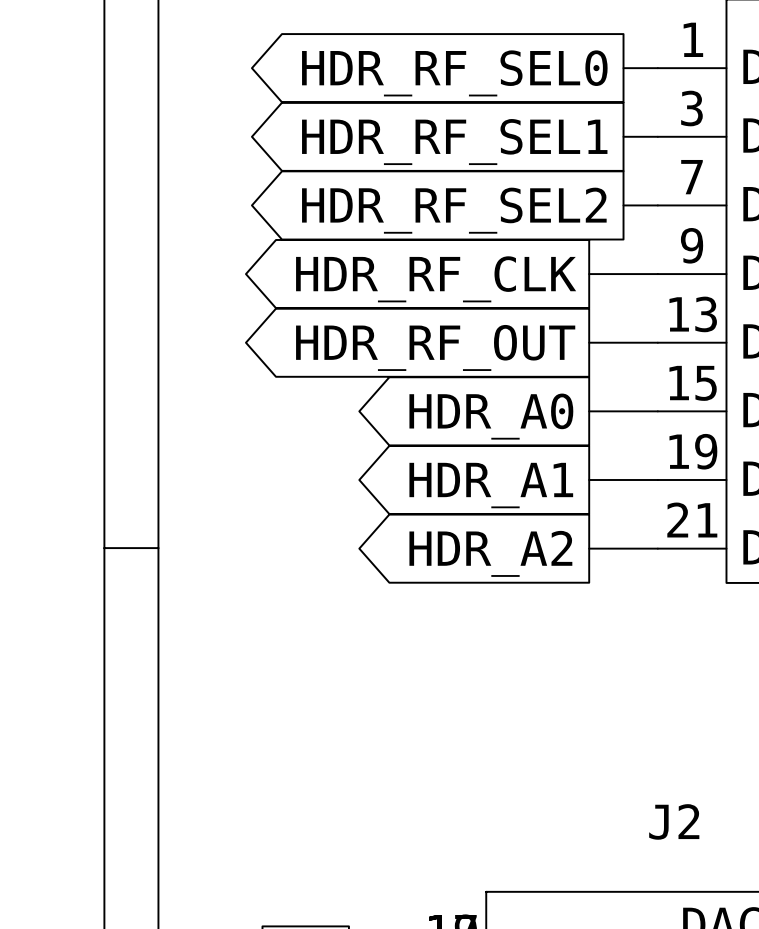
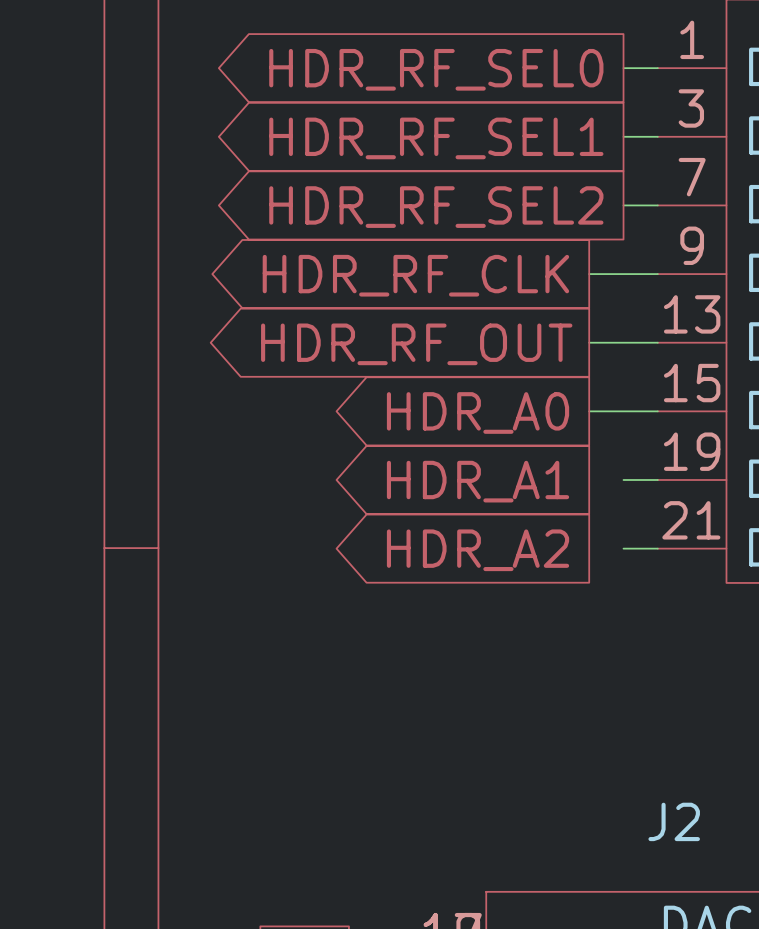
wire: (589, 479) (623, 479) -> none
wire: (589, 548) (623, 548) -> none

